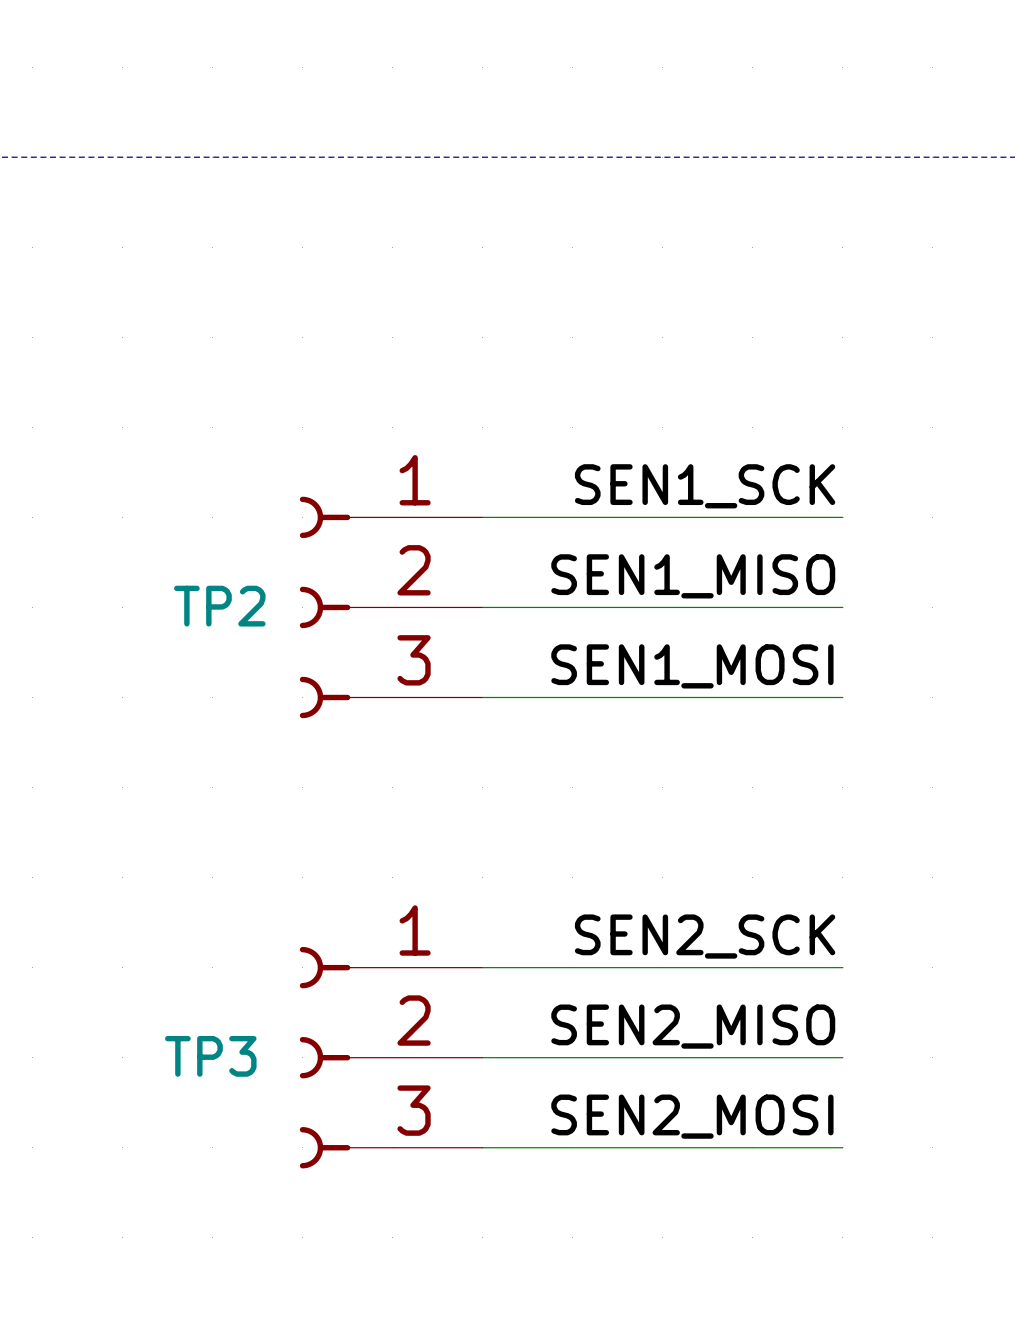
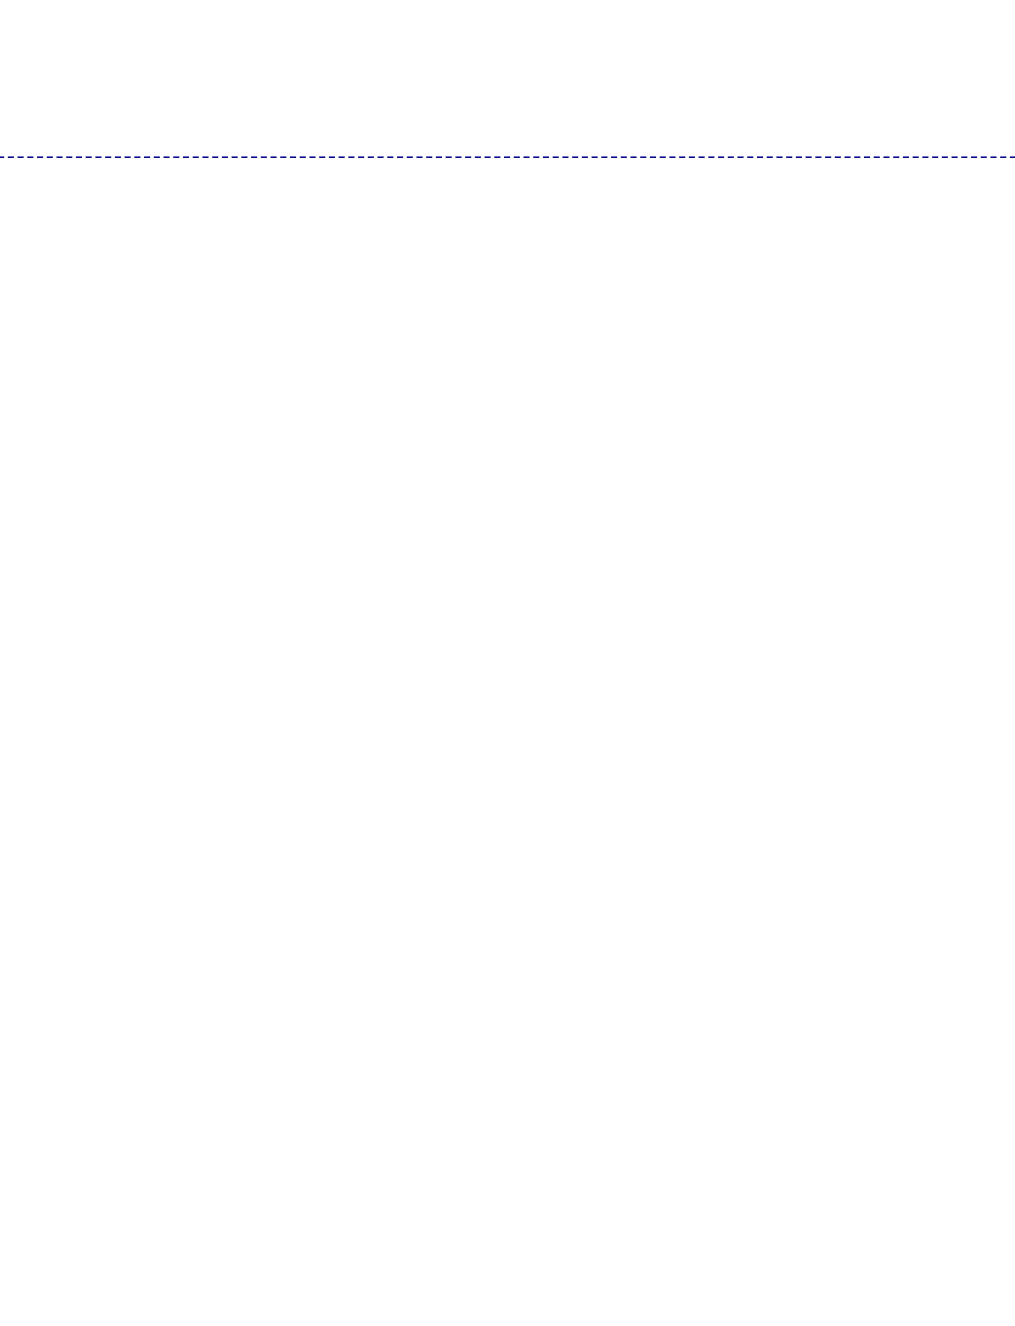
label: SEN1_SCK (705, 486) -> none
wire: (482, 517) (842, 517) -> none
label: SEN1_MISO (693, 576) -> none
TP2: (391, 607) -> none
wire: (482, 607) (842, 607) -> none
label: SEN1_MOSI (692, 666) -> none
wire: (482, 697) (842, 697) -> none
label: SEN2_SCK (705, 936) -> none
wire: (482, 967) (842, 967) -> none
label: SEN2_MISO (693, 1026) -> none
TP3: (391, 1057) -> none
wire: (482, 1057) (842, 1057) -> none
label: SEN2_MOSI (692, 1116) -> none
wire: (482, 1147) (842, 1147) -> none

